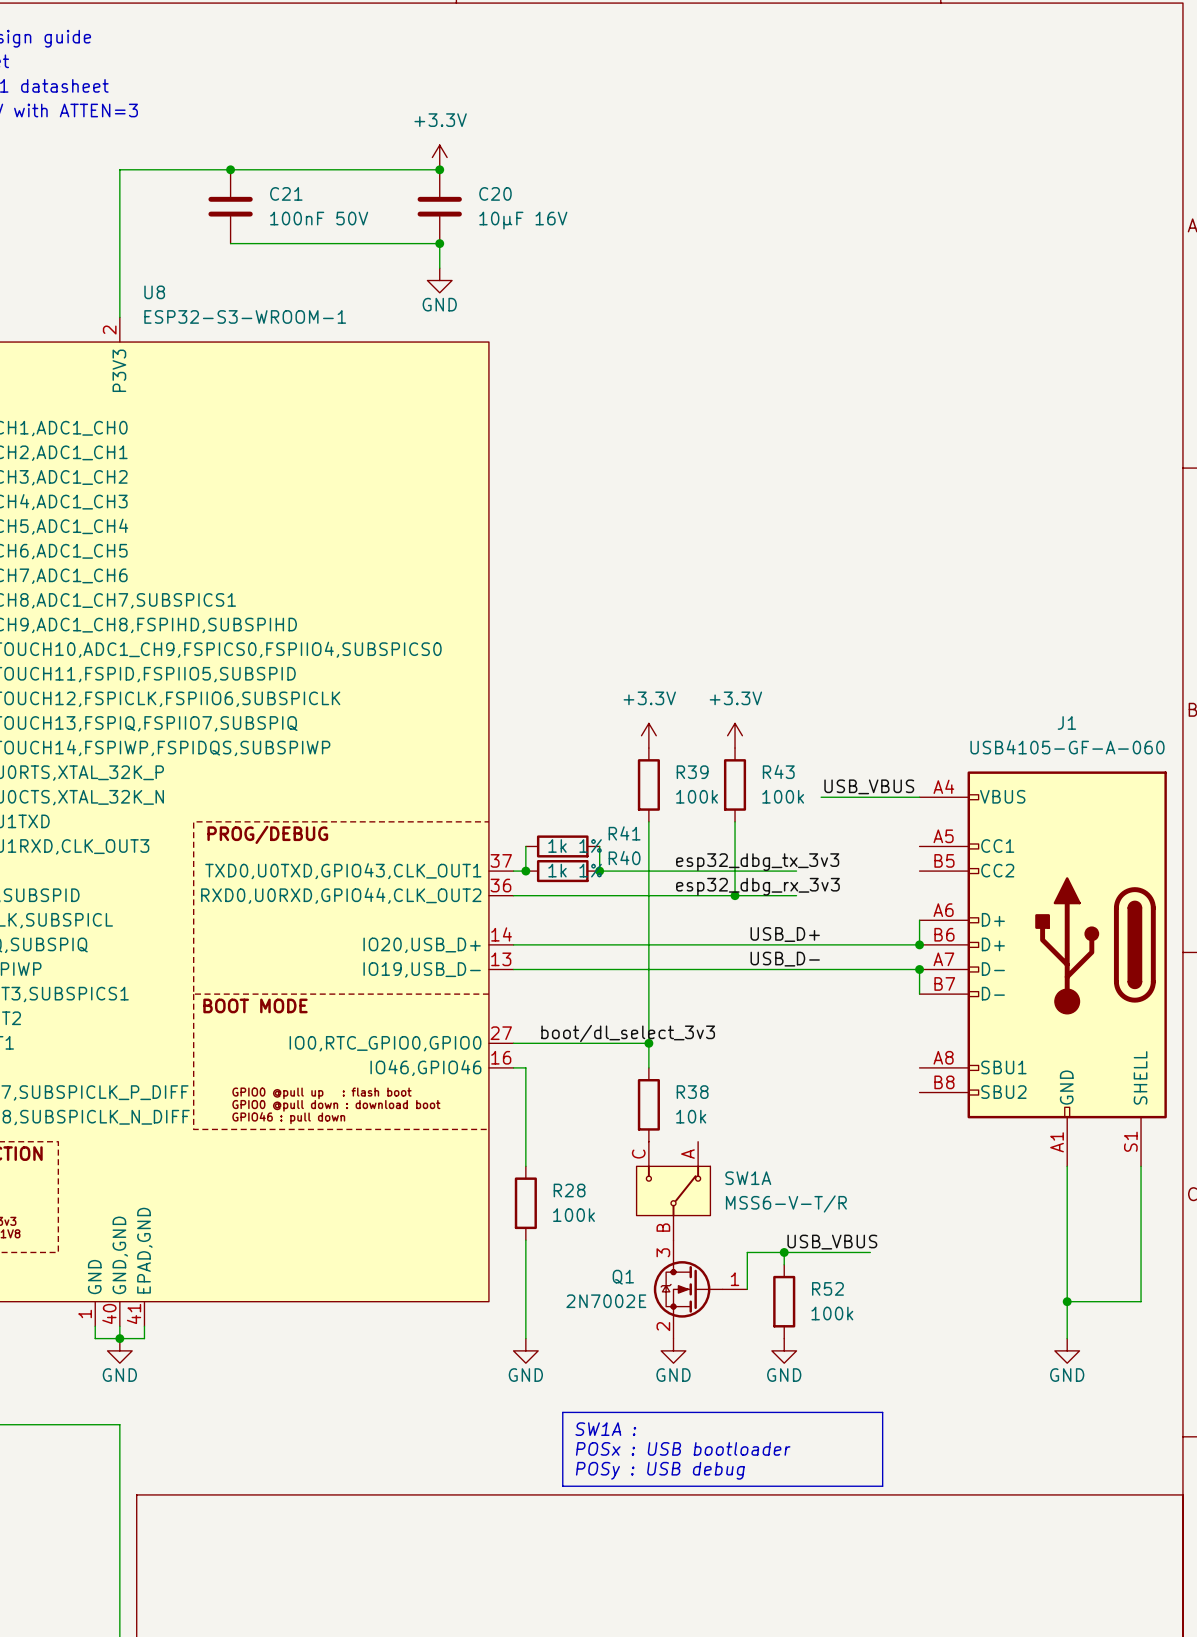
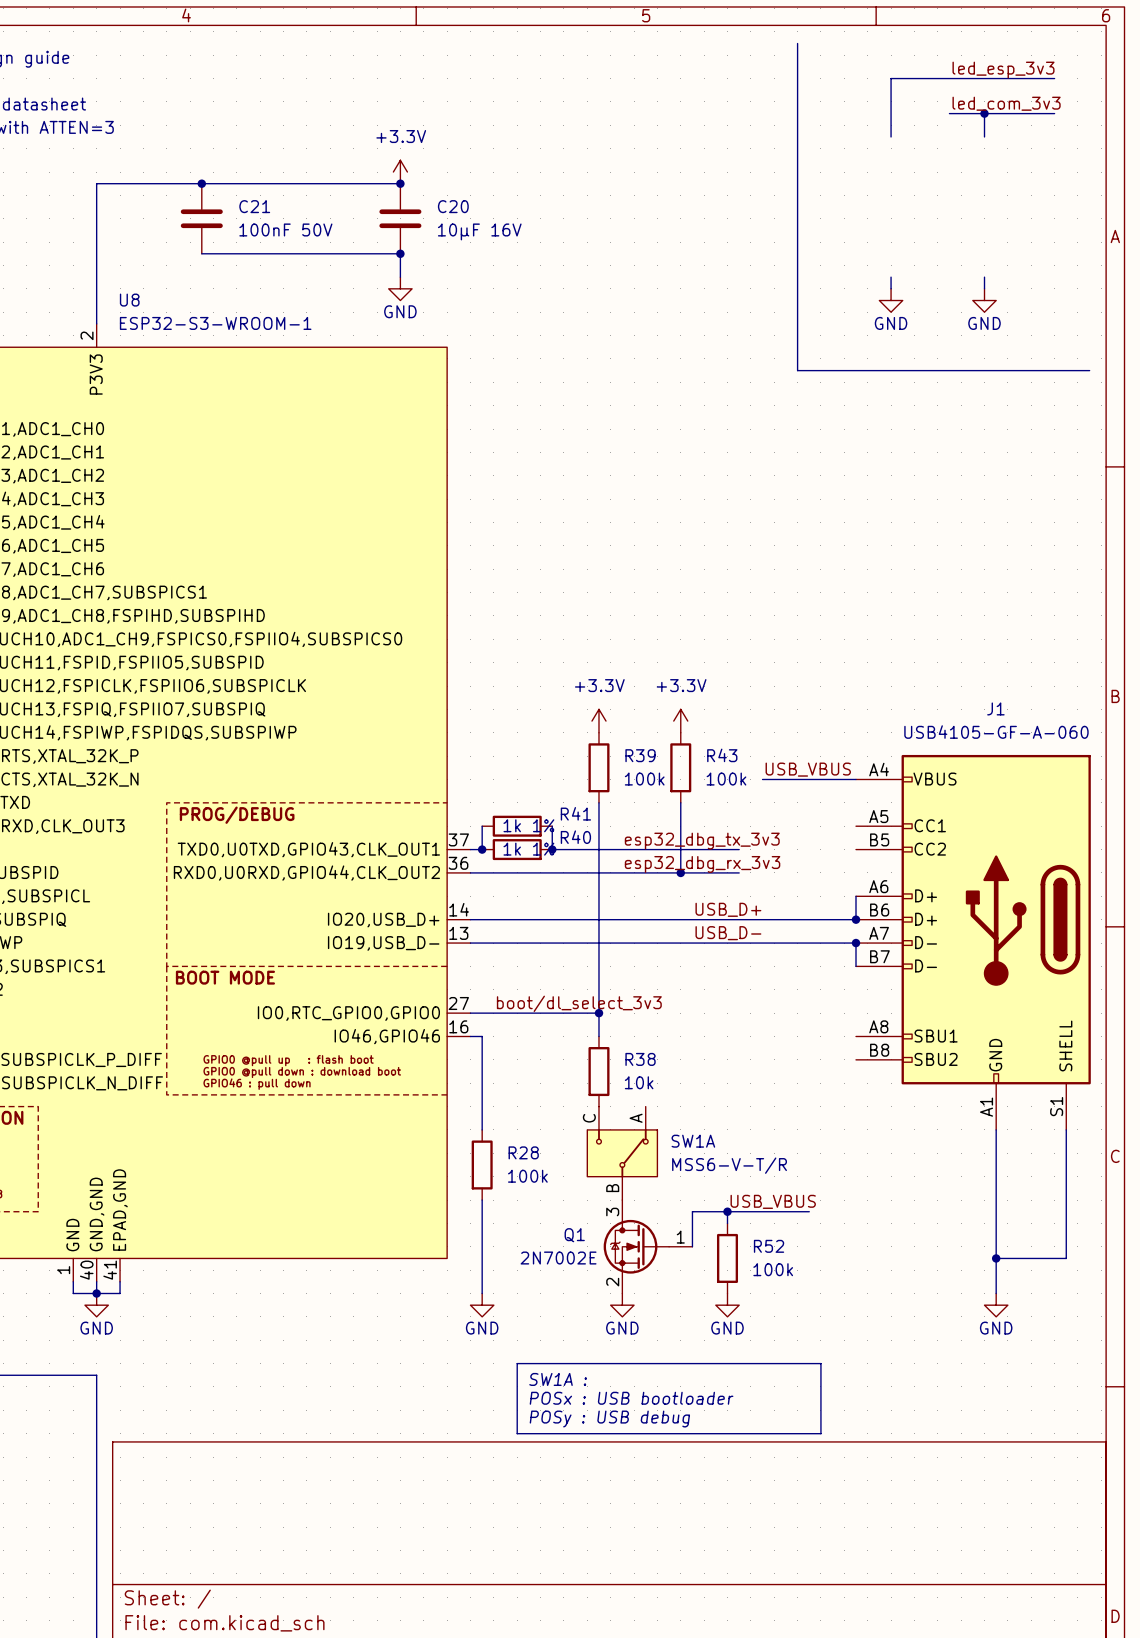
wire: none -> (797, 43) (797, 370) (1089, 370)
label: none -> led_esp_3v3 (1003, 70)
wire: none -> (1054, 78) (891, 78) (891, 136)
label: none -> led_com_3v3 (1006, 103)
wire: none -> (949, 113) (1054, 113)
wire: none -> (984, 113) (984, 136)
junction: none -> (984, 113)
wire: none -> (891, 277) (891, 288)
wire: none -> (984, 277) (984, 288)
power symbol: none -> GND (891, 300)
power symbol: none -> GND (984, 300)

